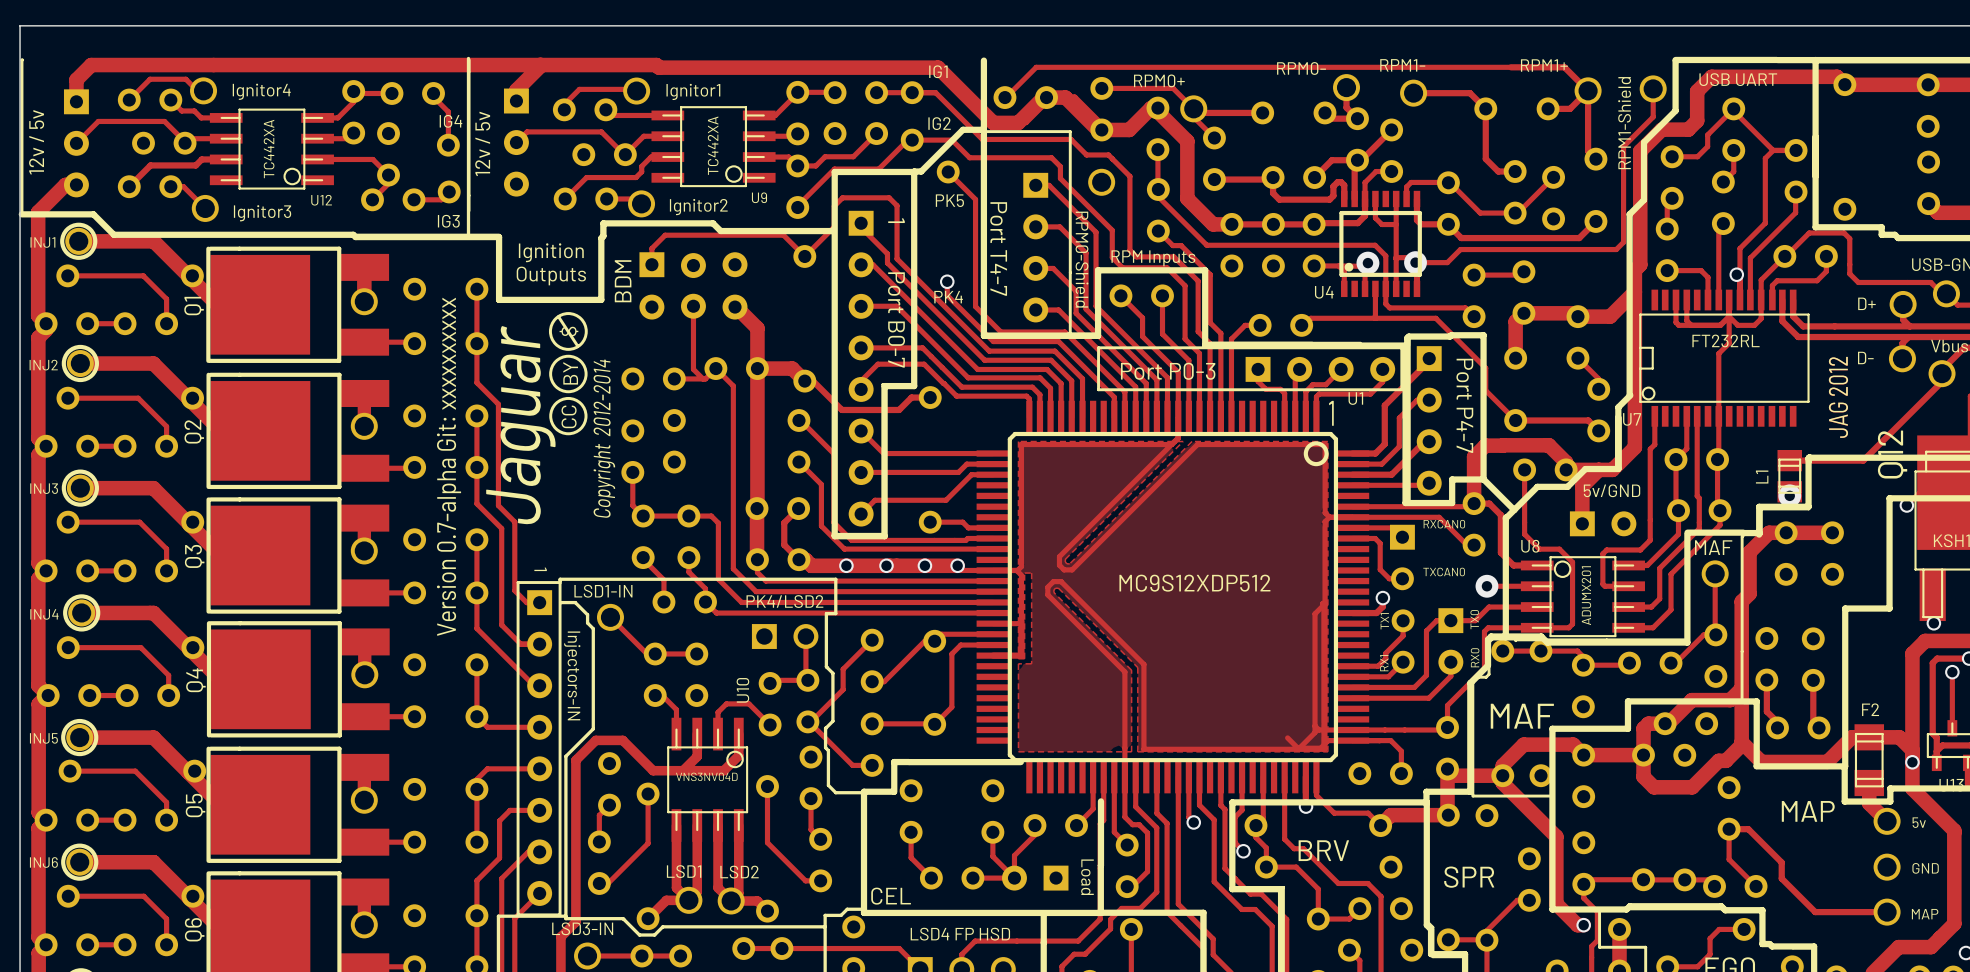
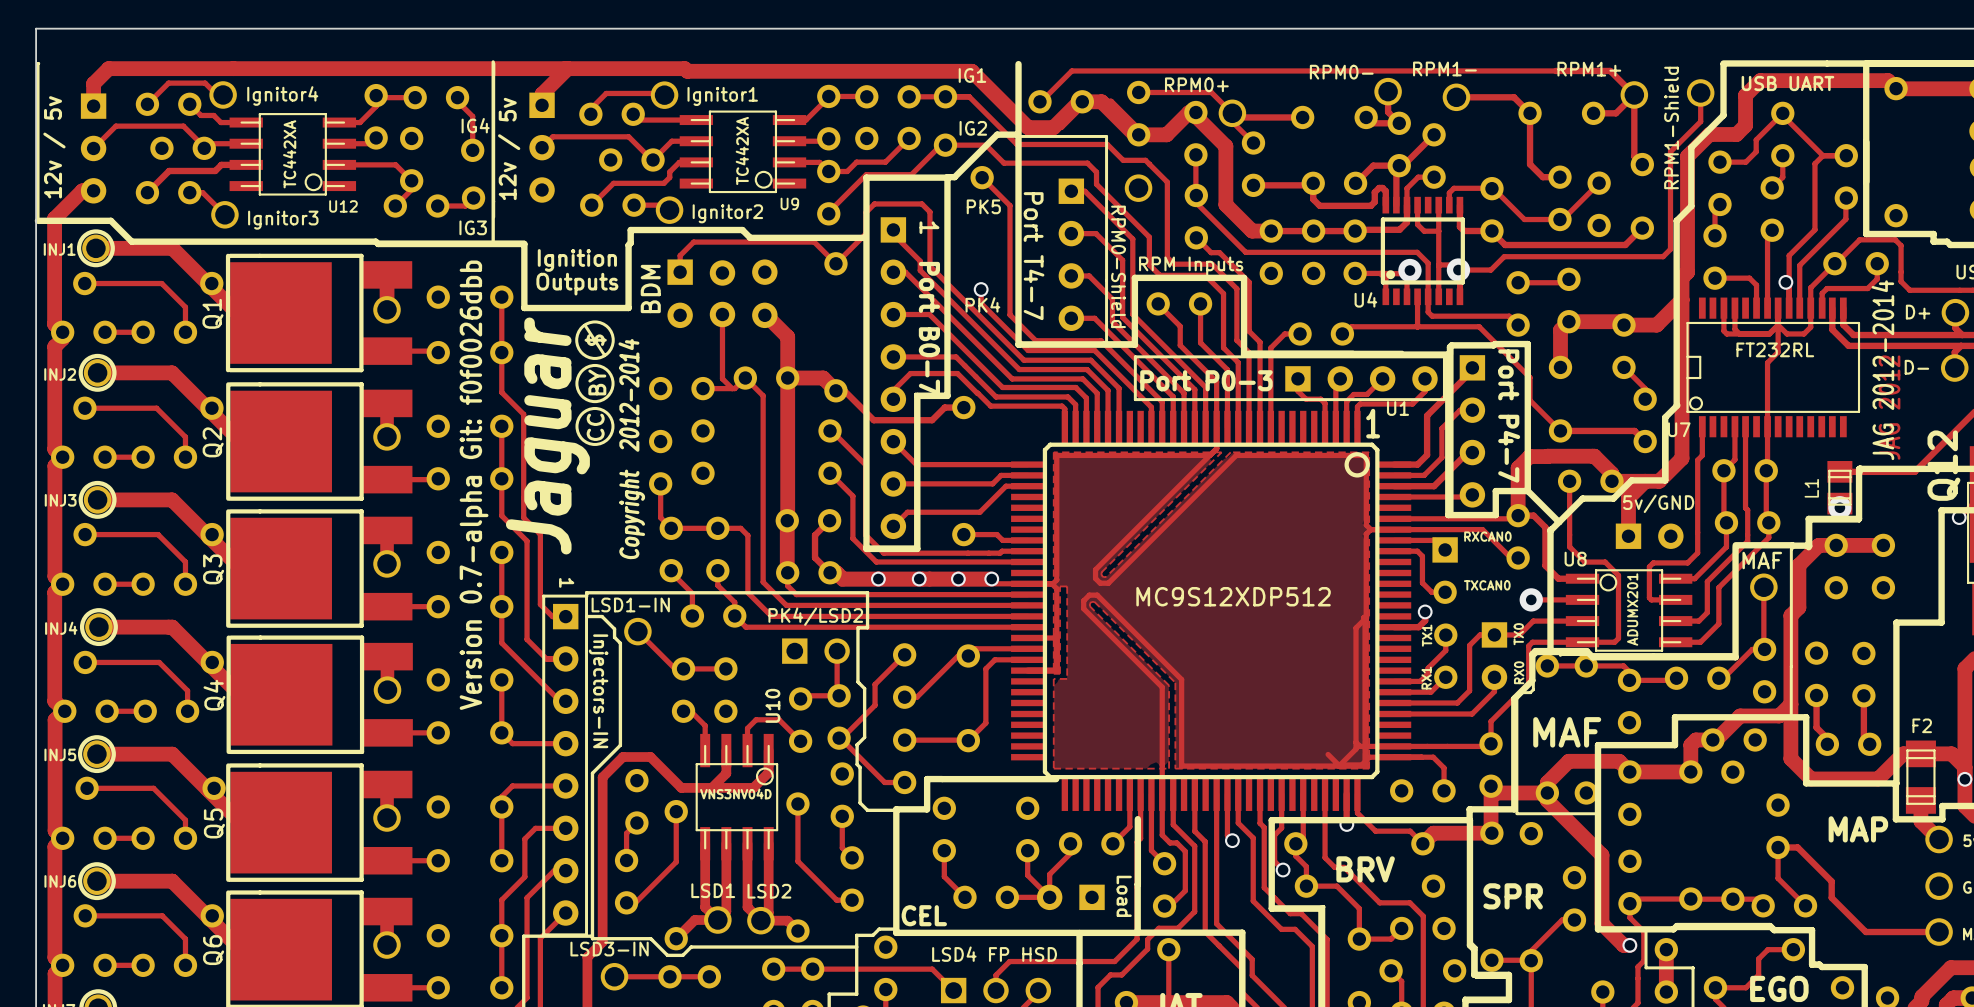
text: JAG 2012 (1838, 397) -> JAG 2012-2014 (1882, 370)
text: Version 0.7-alpha Git: xxxxxxxxxx (449, 466) -> Version 0.7-alpha Git: f0f0026dbb (474, 485)
track: (1741, 742) (1741, 745) (1725, 760) (1718, 760) (1692, 787) (1653, 787) (1643, 776) (1643, 755) -> none

